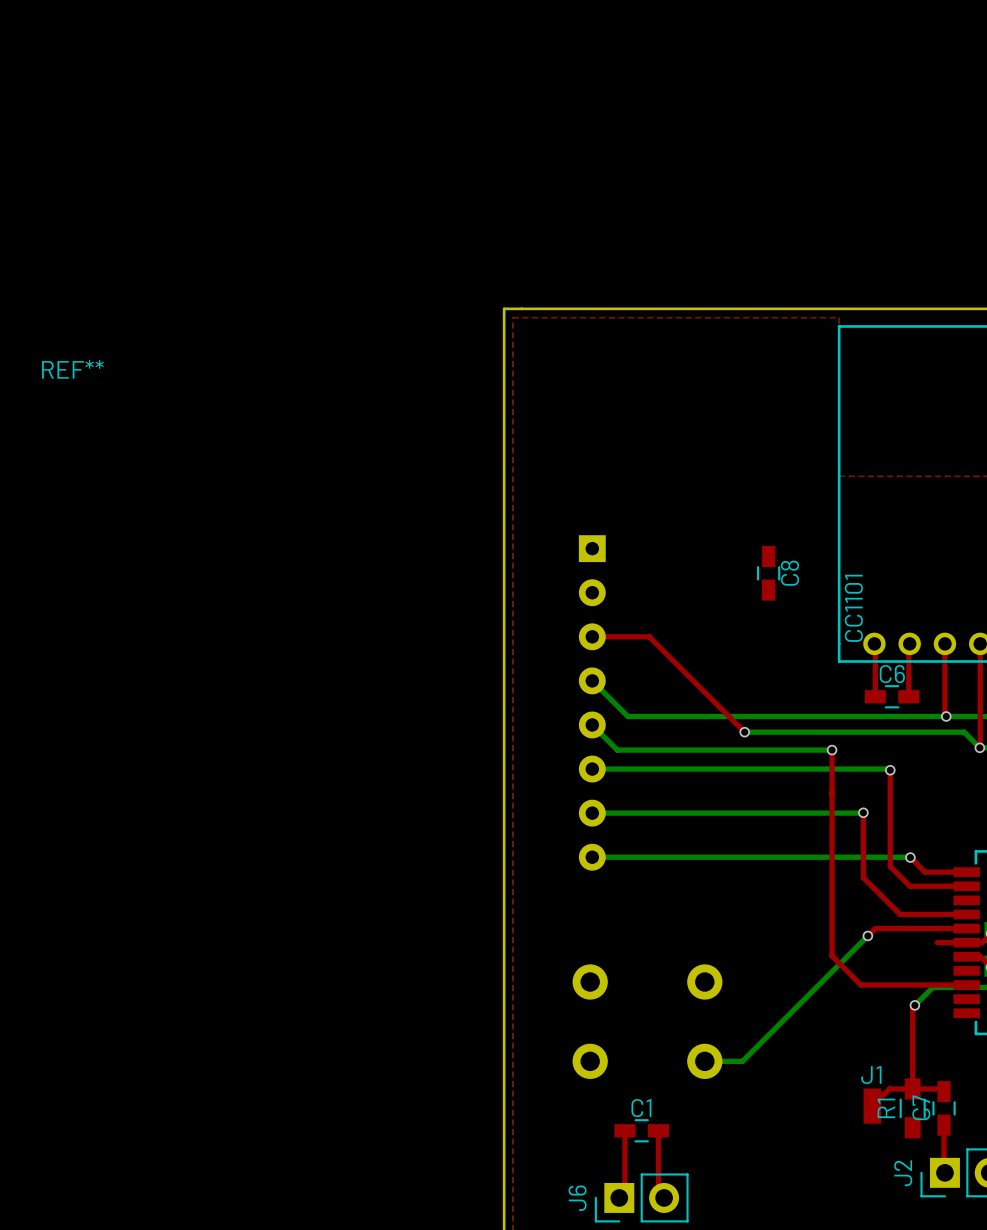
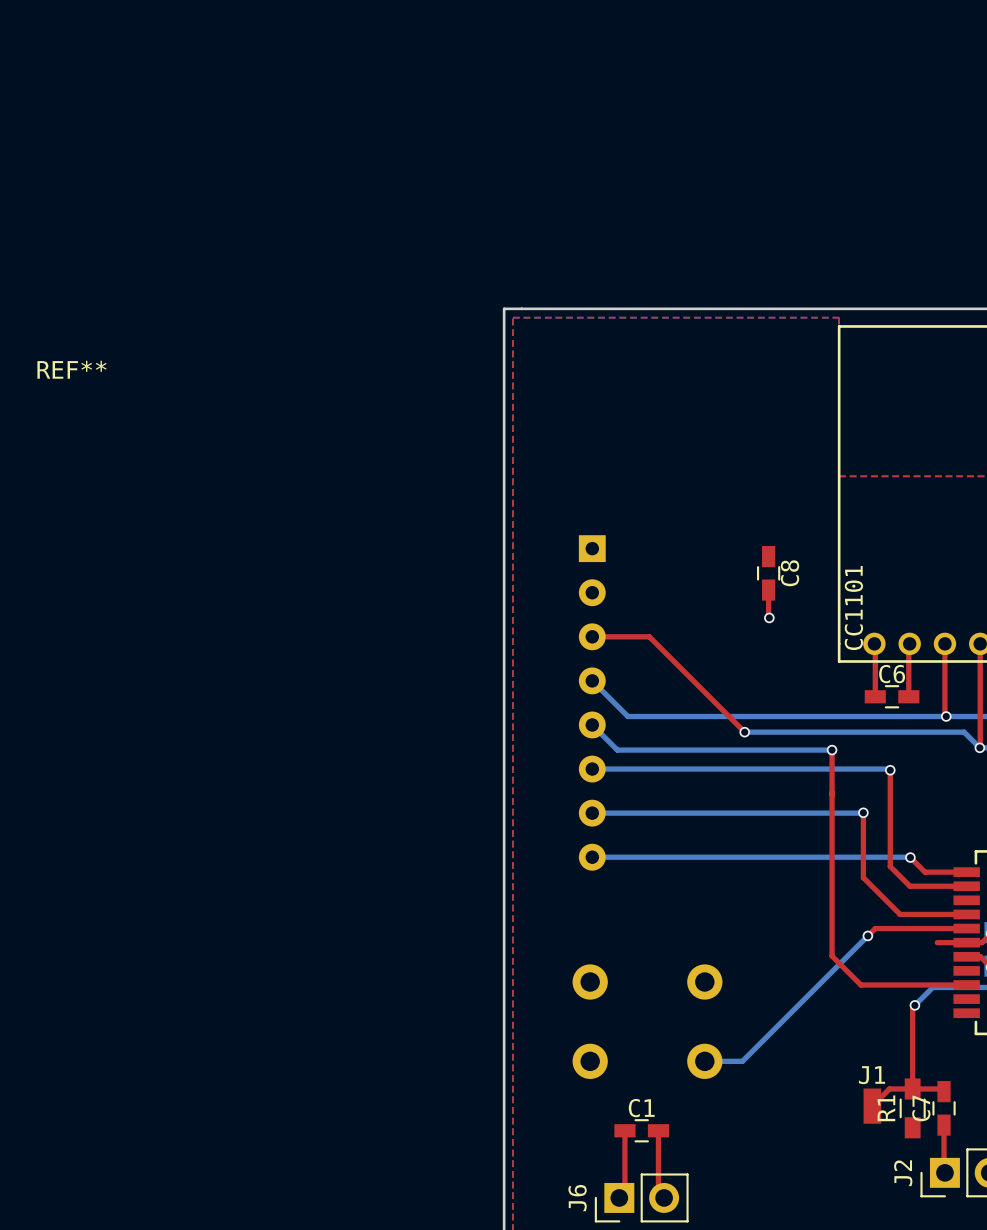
top track: none -> (768, 590) (769, 617)
via: none -> (769, 617)

